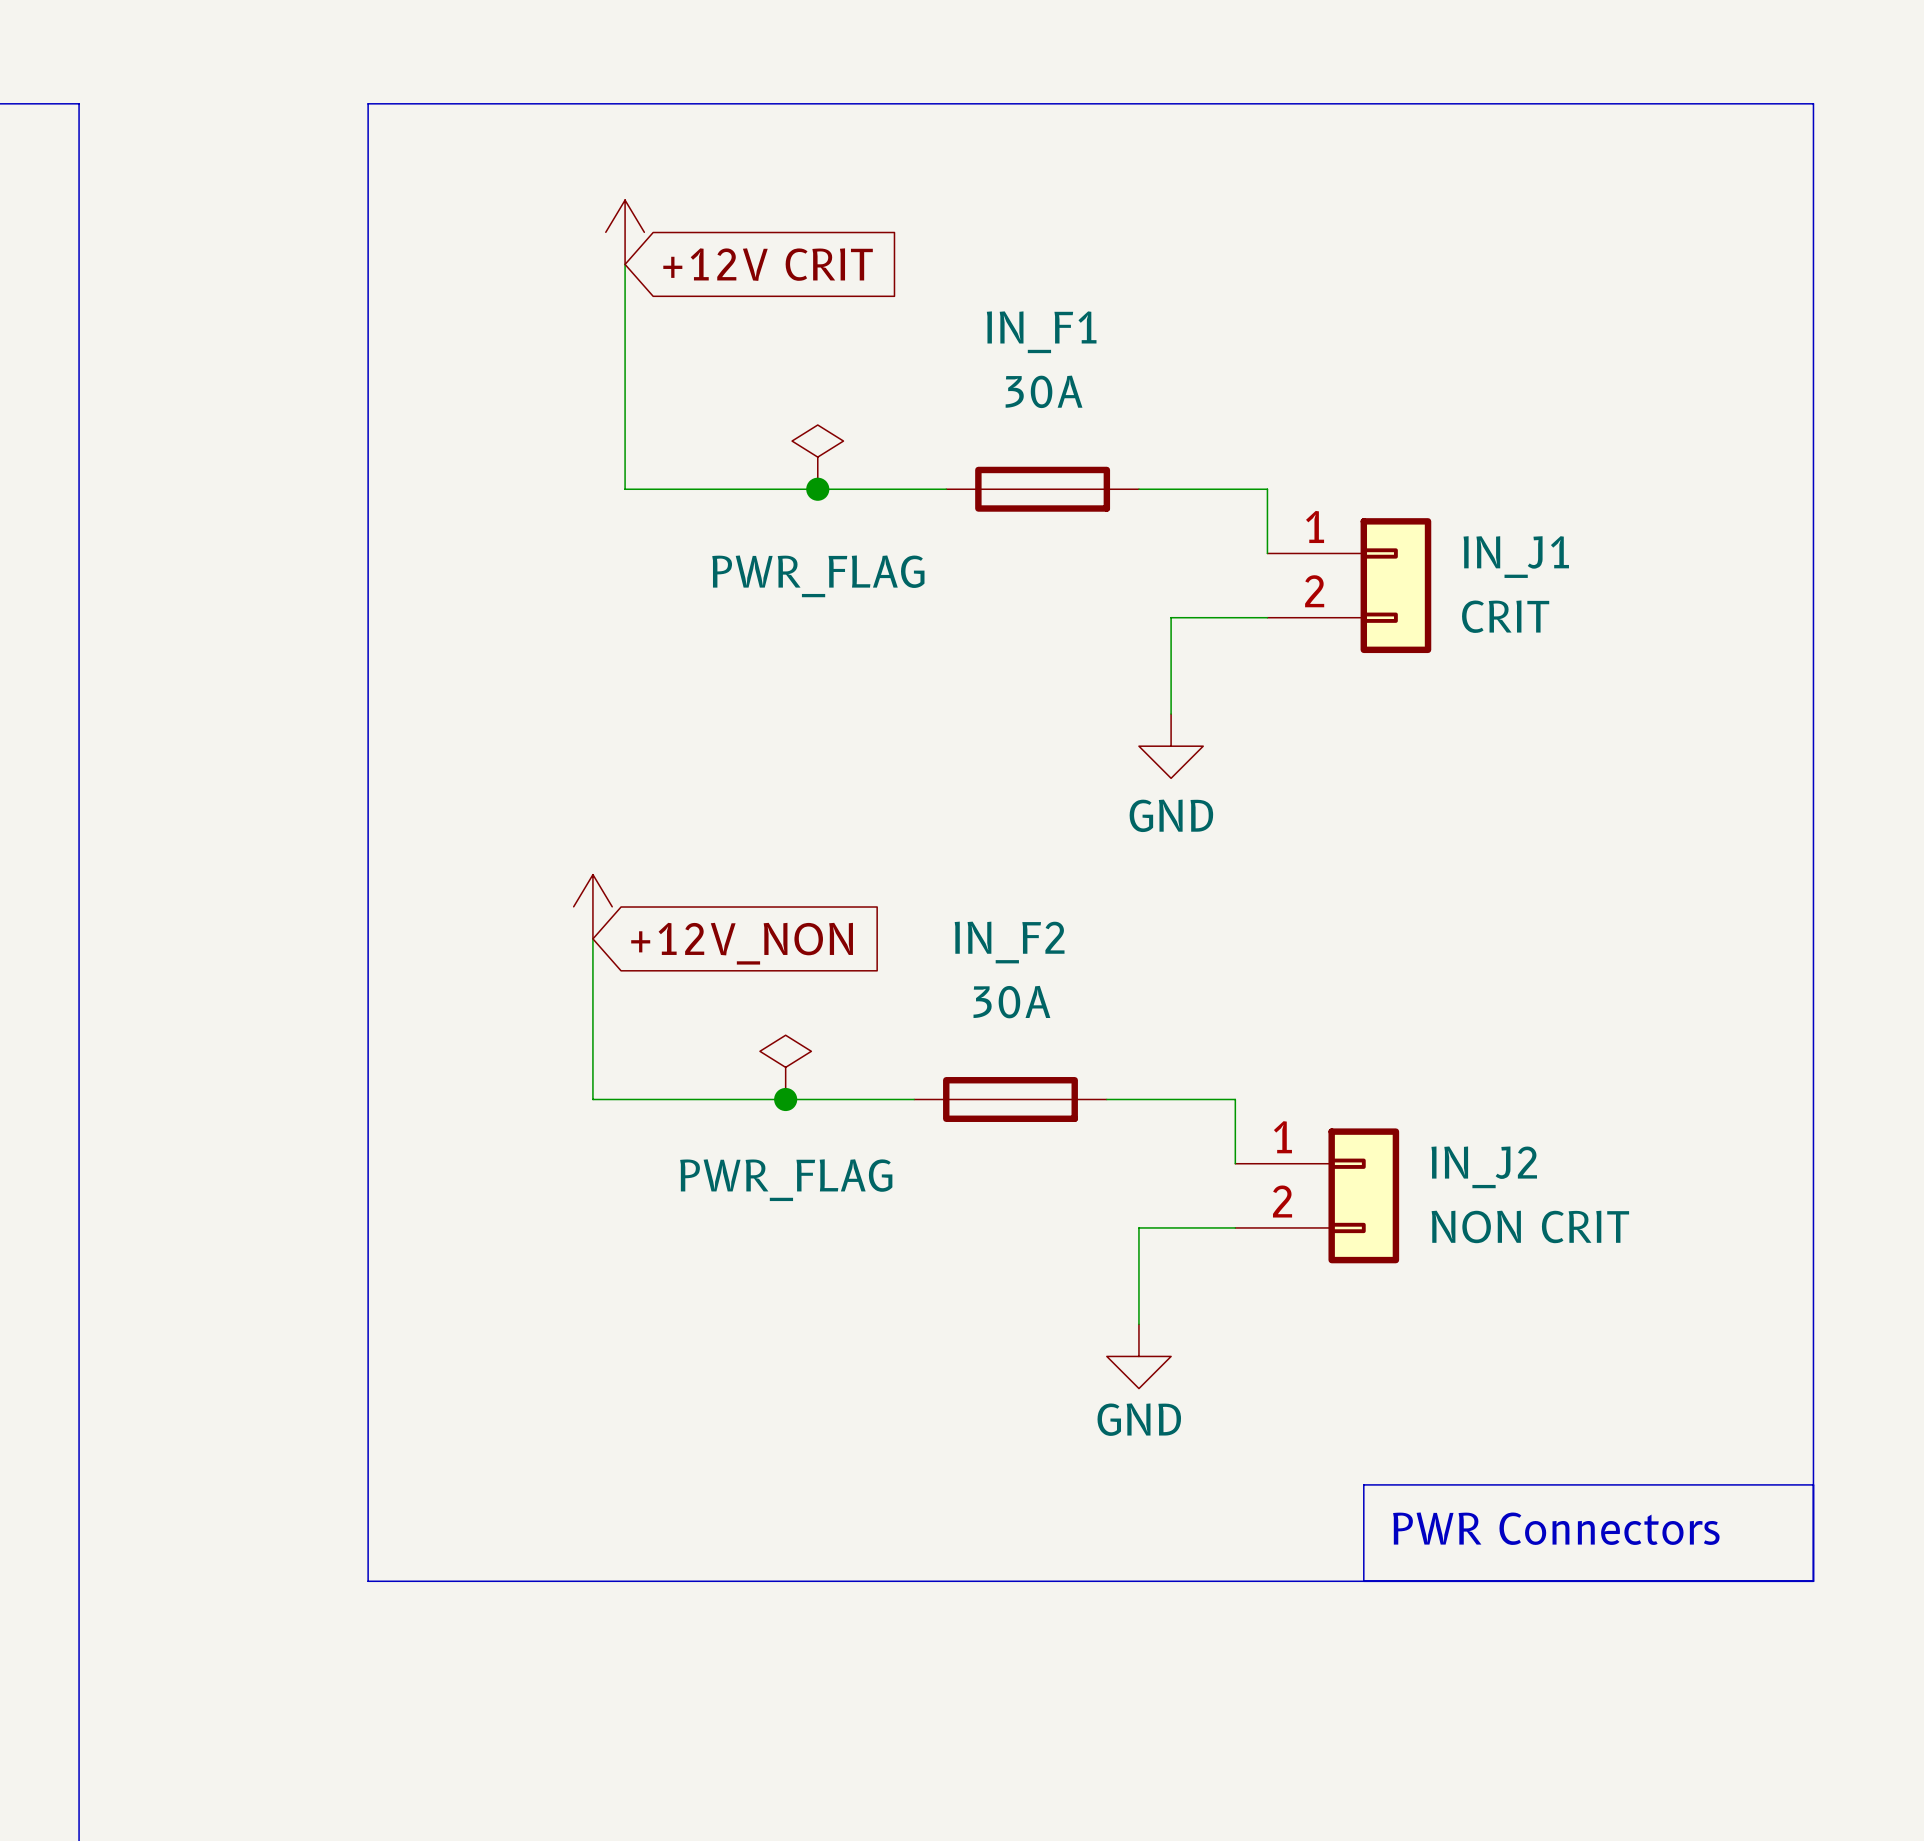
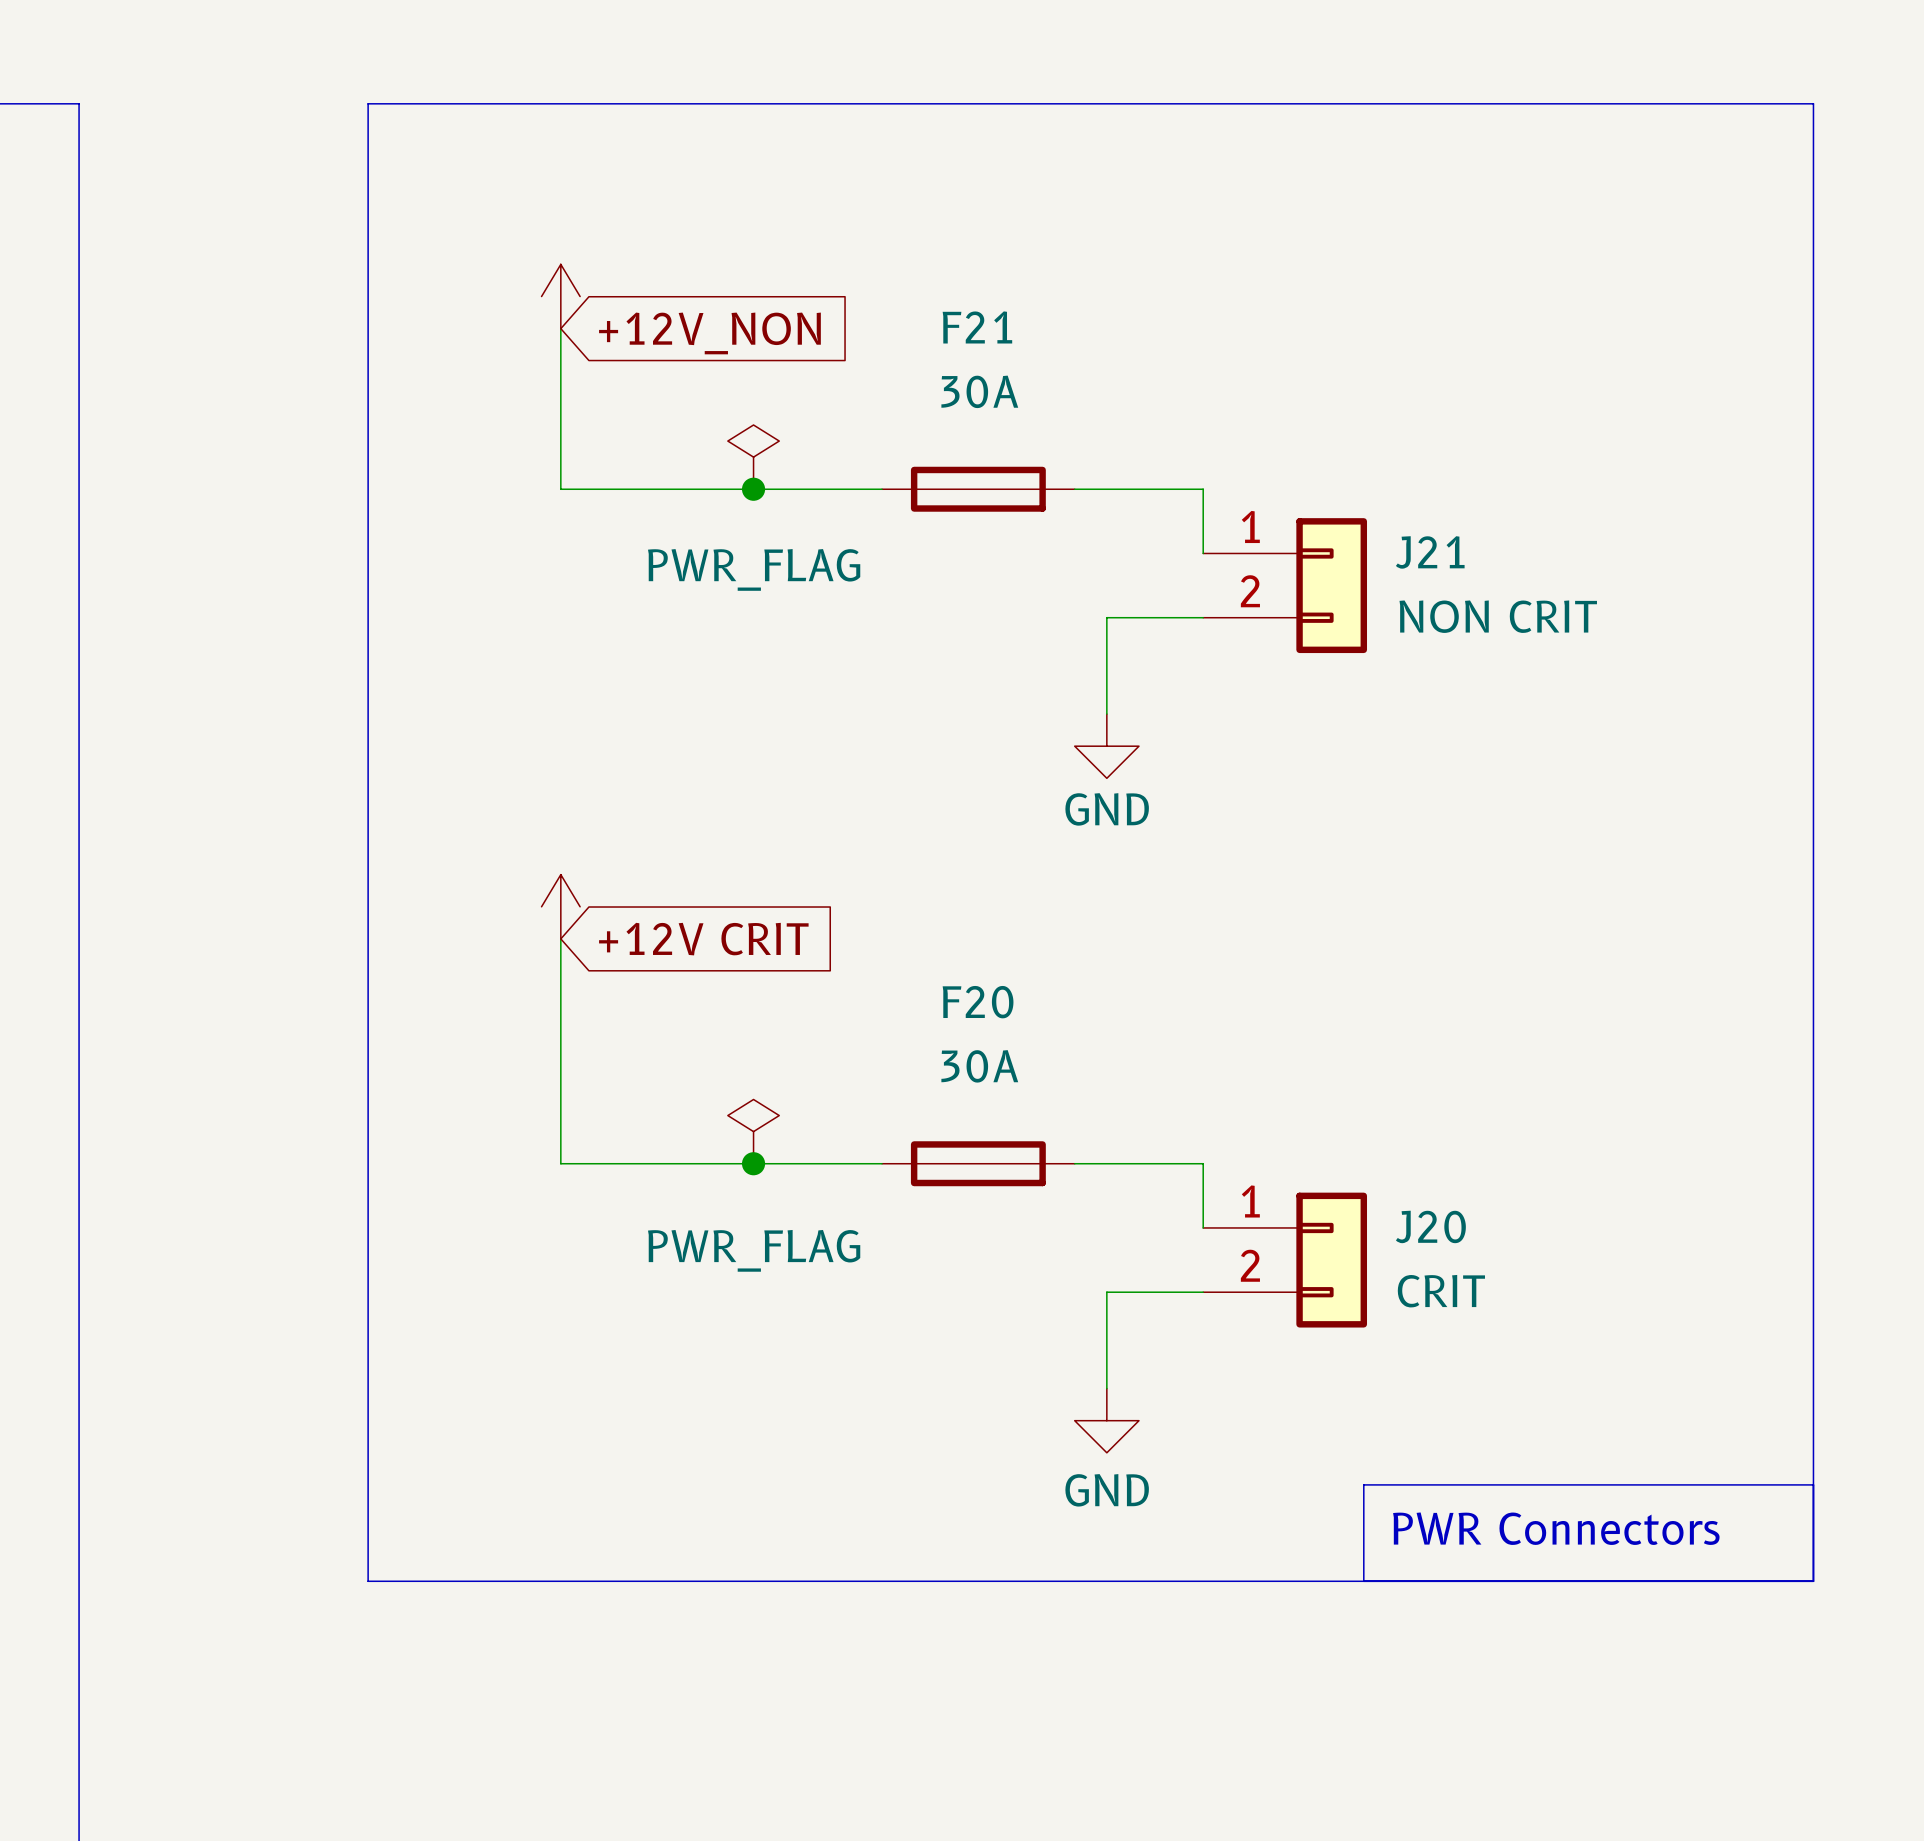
power symbol position: (625, 232) -> (560, 296)
wire: (625, 264) (625, 489) -> (560, 328) (560, 489) (625, 489)
global label: +12V CRIT (768, 264) -> none
power symbol position: PWR_FLAG (817, 457) -> PWR_FLAG (753, 457)
junction position: (817, 489) -> (753, 489)
F21: none -> 30A (978, 489)
IN_F1: 30A (1042, 489) -> none
wire: (1203, 489) (1267, 489) (1267, 553) -> (1203, 489) (1203, 553)
power symbol text position: PWR_FLAG (818, 576) -> PWR_FLAG (754, 569)
J21: none -> NON CRIT (1285, 585)
IN_J1: CRIT (1349, 585) -> none
wire: (1171, 617) (1171, 714) -> (1171, 617) (1106, 617) (1106, 714)
power symbol position: GND (1171, 746) -> GND (1106, 746)
power symbol text position: GND (1171, 815) -> GND (1107, 809)
power symbol position: (592, 906) -> (560, 906)
wire: none -> (560, 938) (560, 1163) (882, 1163)
wire: (592, 938) (592, 1099) (914, 1099) -> none
global label: none -> +12V CRIT (703, 939)
global label position: +12V_NON (742, 943) -> +12V_NON (709, 333)
power symbol position: PWR_FLAG (785, 1067) -> PWR_FLAG (753, 1131)
junction position: (785, 1099) -> (753, 1163)
IN_F2: 30A (1010, 1099) -> none
wire: (1106, 1099) (1235, 1099) (1235, 1163) -> (1074, 1163) (1203, 1163) (1203, 1227)
F20: none -> 30A (978, 1163)
power symbol text position: PWR_FLAG (786, 1180) -> PWR_FLAG (754, 1250)
IN_J2: NON CRIT (1317, 1195) -> none
wire: (1235, 1227) (1138, 1227) (1138, 1324) -> (1203, 1292) (1106, 1292) (1106, 1388)
J20: none -> CRIT (1285, 1260)
power symbol position: GND (1138, 1356) -> GND (1106, 1420)
power symbol text position: GND (1139, 1419) -> GND (1107, 1490)

